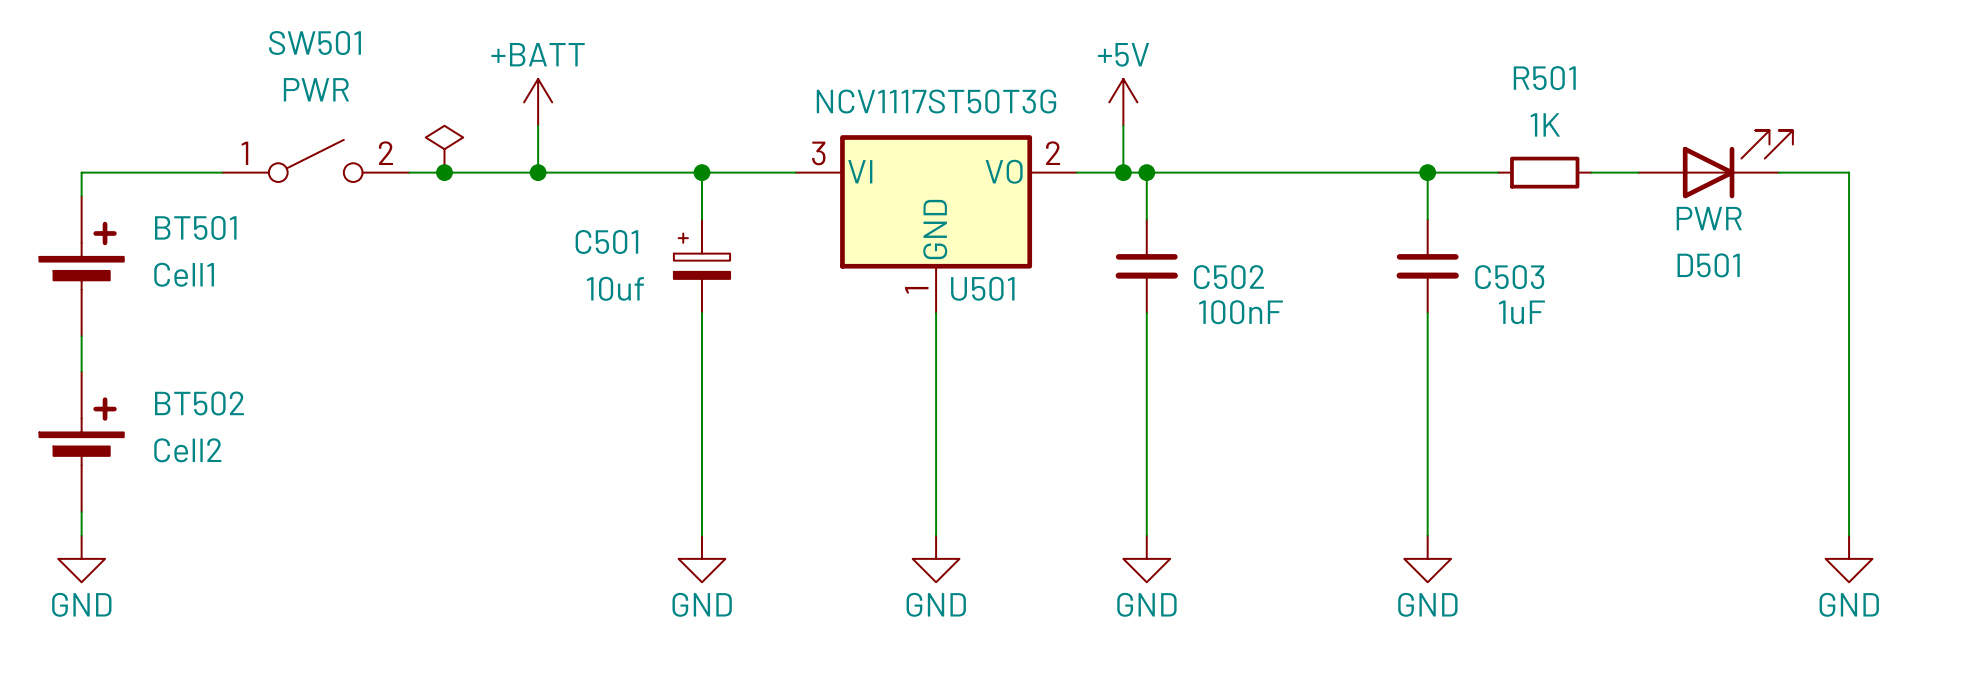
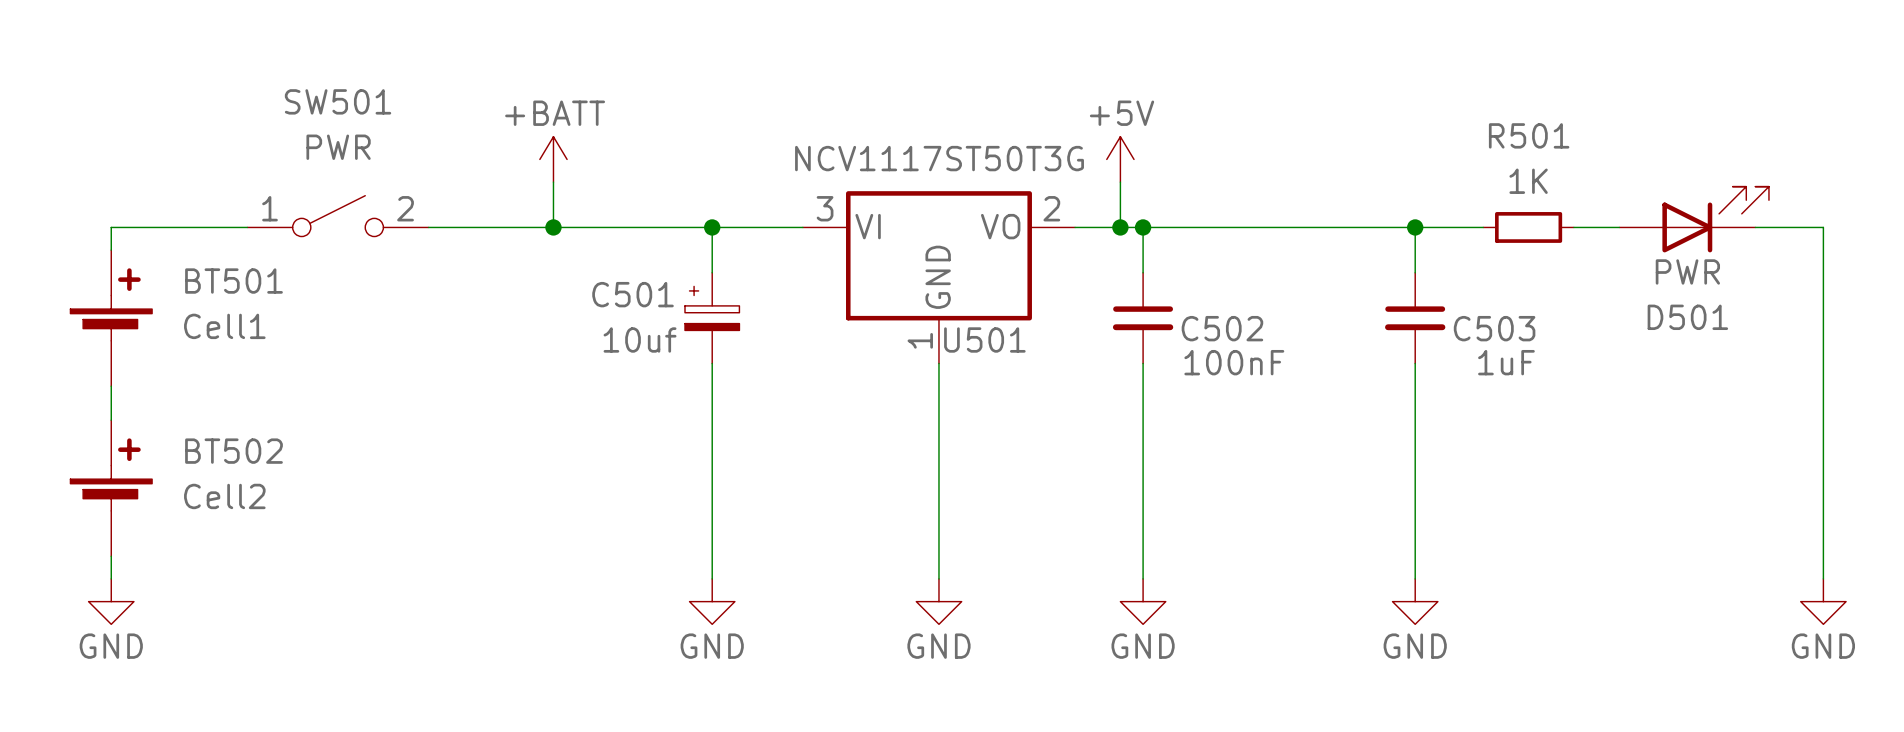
power symbol: (444, 149) -> none
junction: (444, 172) -> none
BT501 symbol: [39, 196, 124, 337] -> [70, 250, 153, 387]
BT502 symbol: [39, 371, 124, 513] -> [70, 420, 153, 557]

